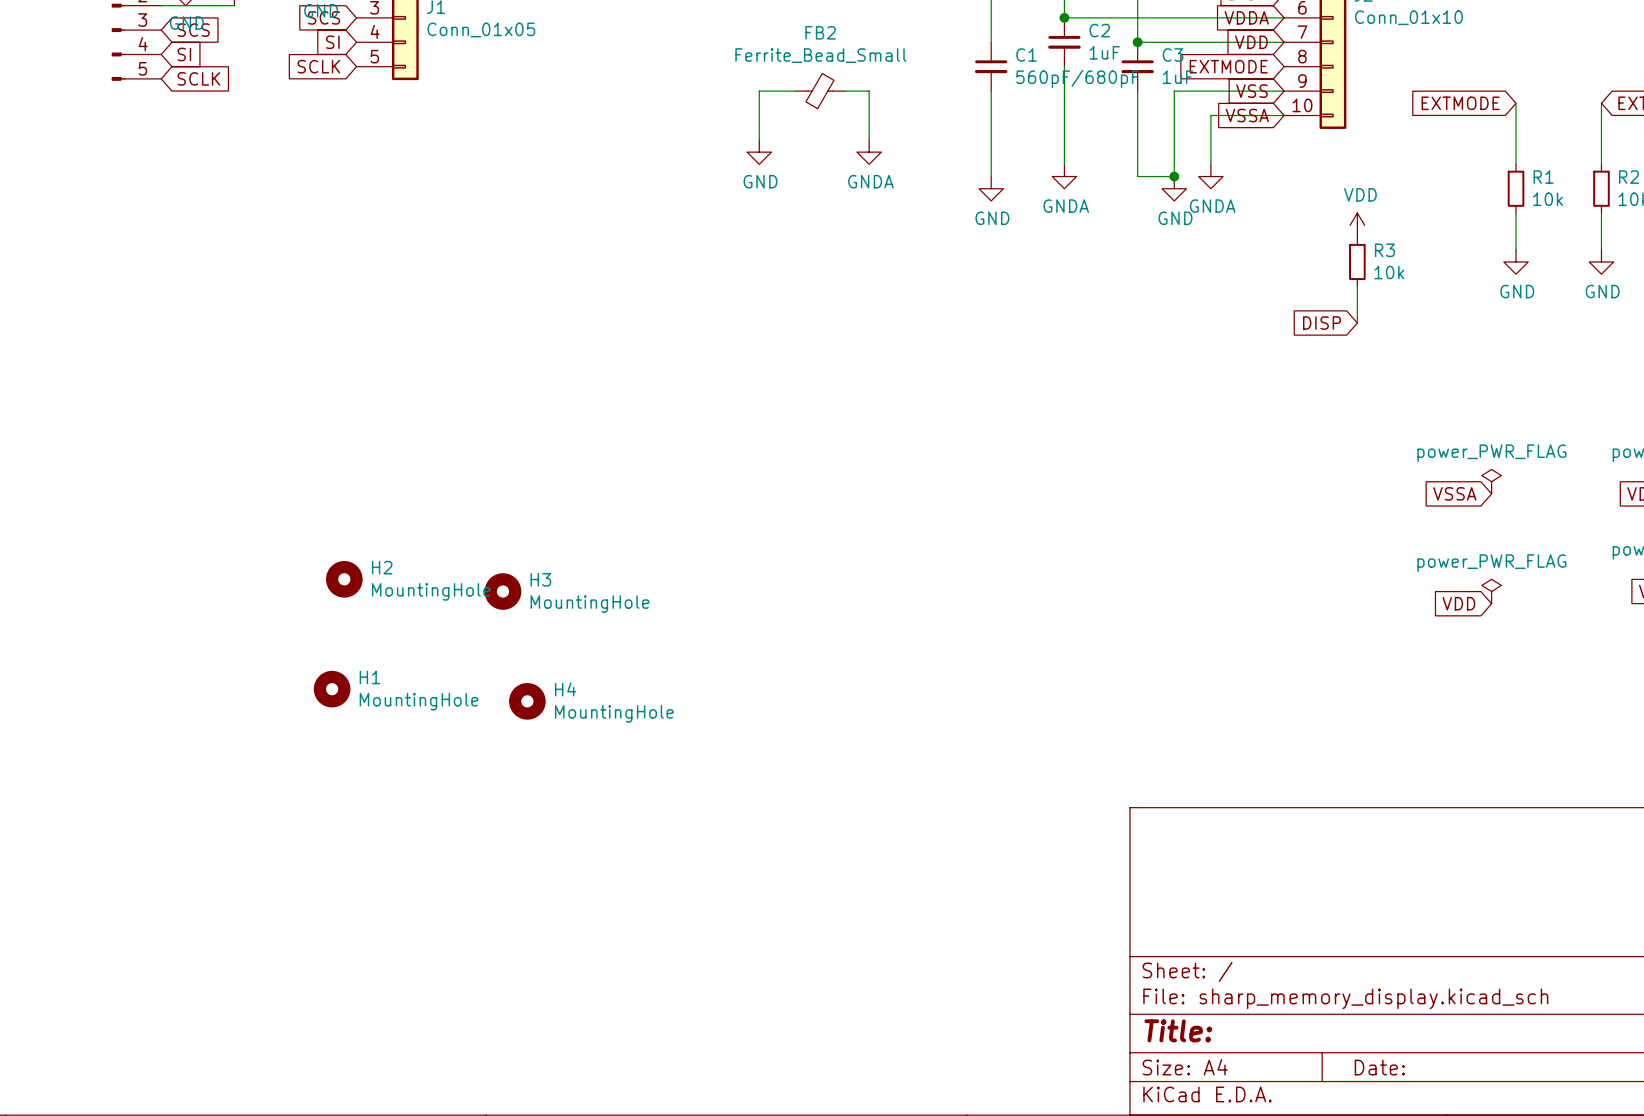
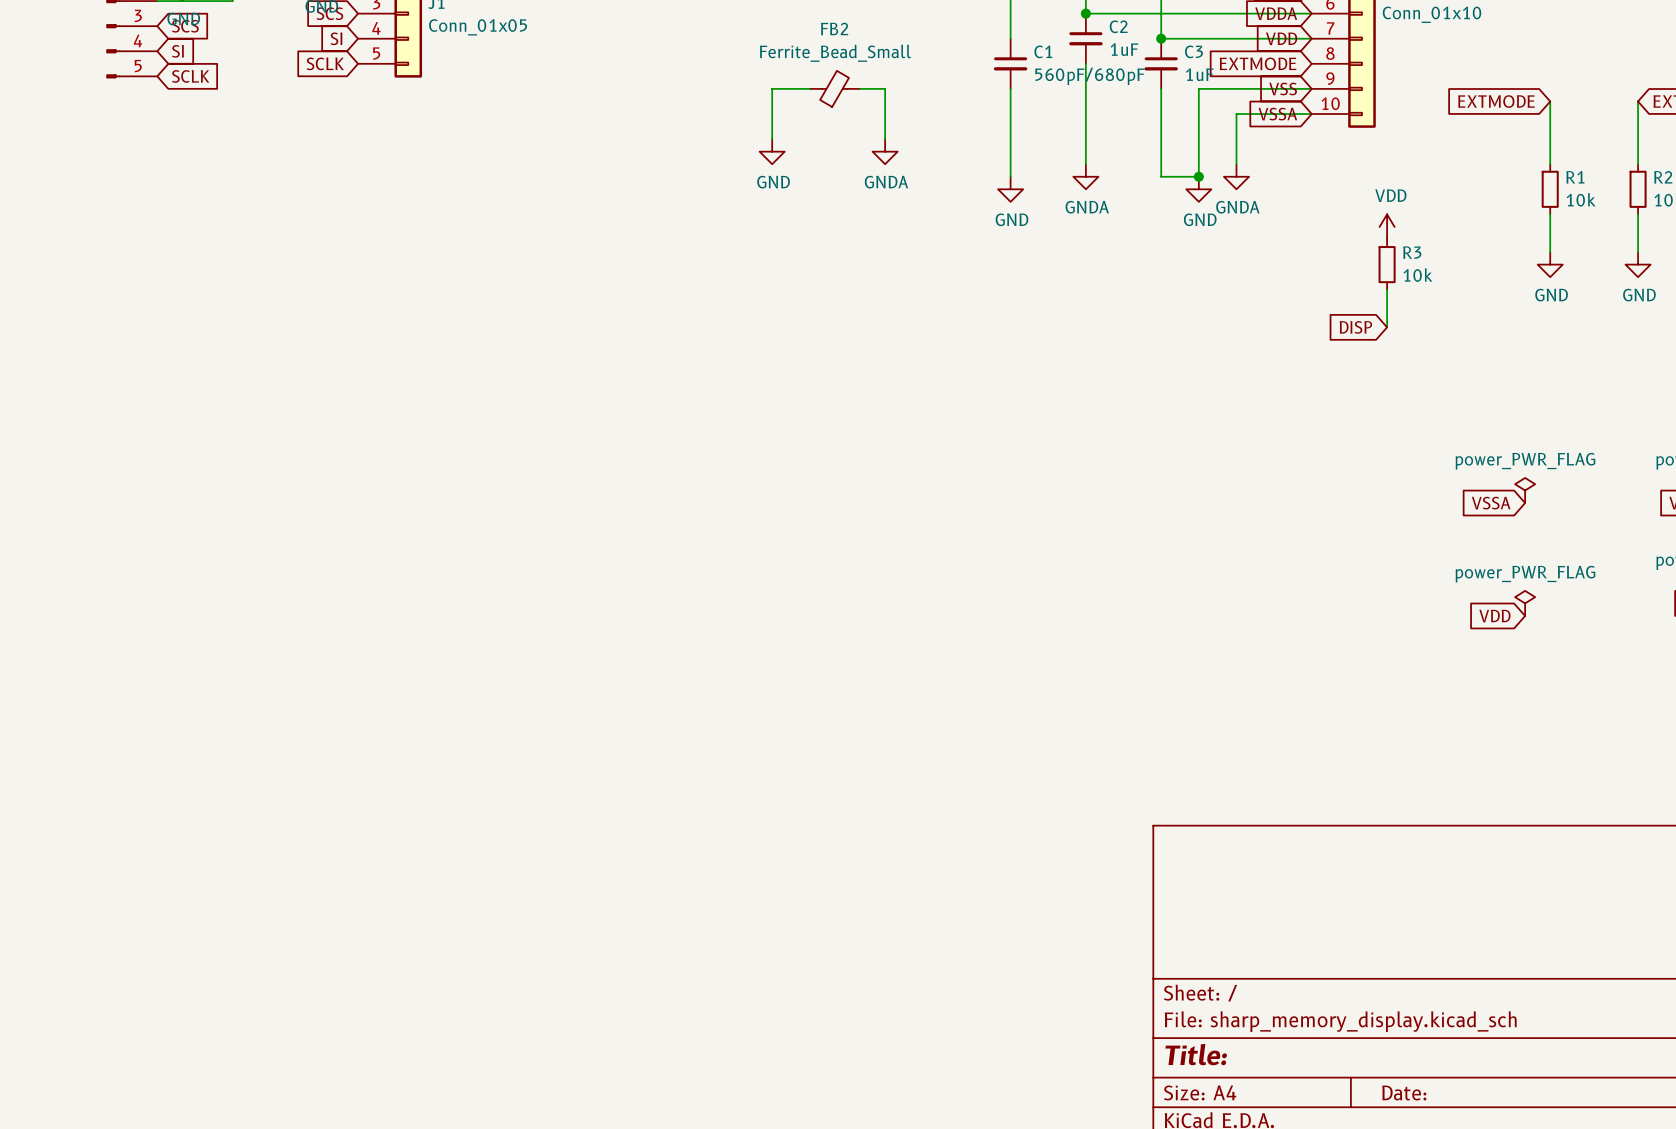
H2: MountingHole (344, 579) -> none
H3: MountingHole (502, 591) -> none
H1: MountingHole (332, 689) -> none
H4: MountingHole (527, 701) -> none

